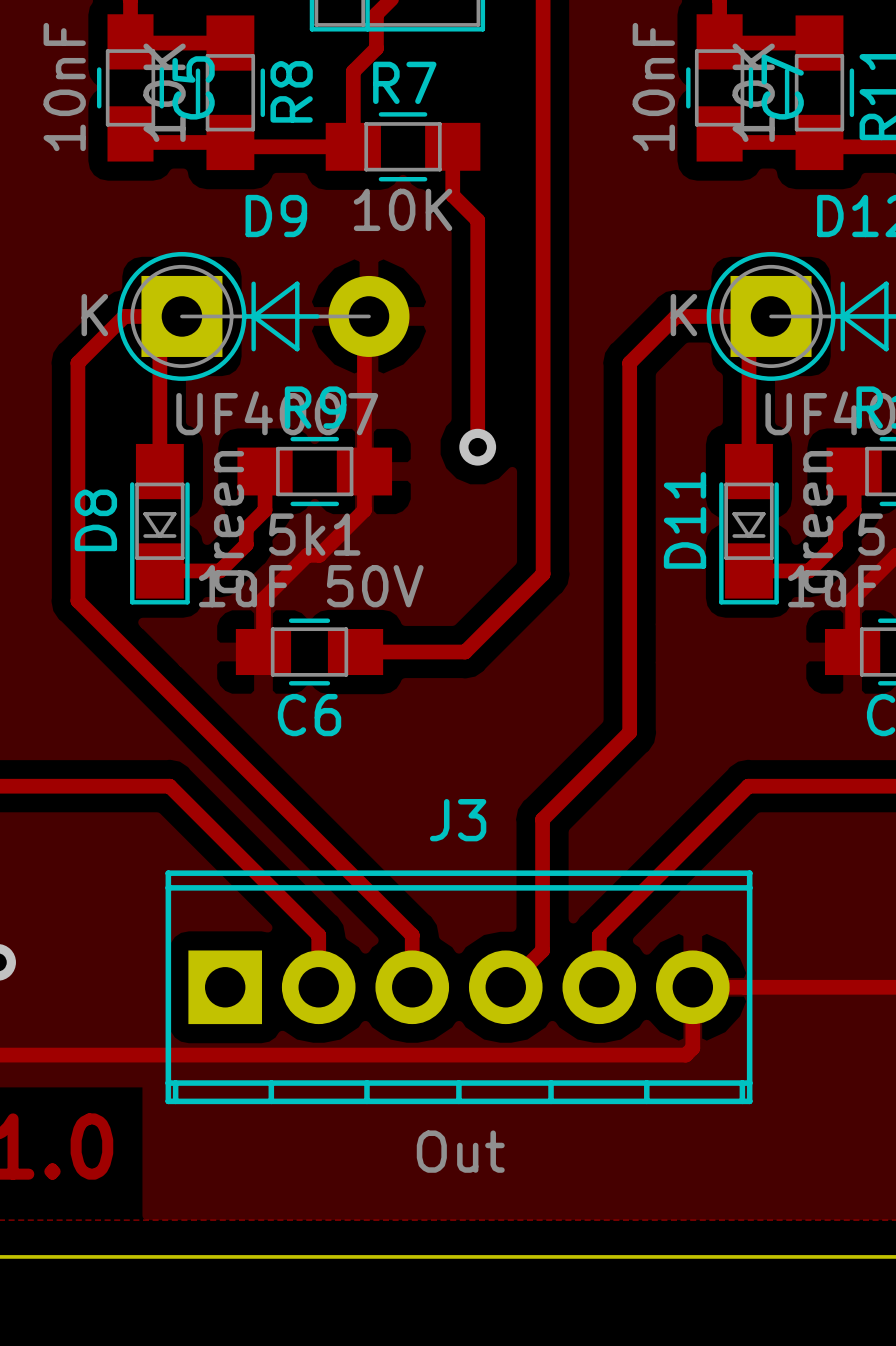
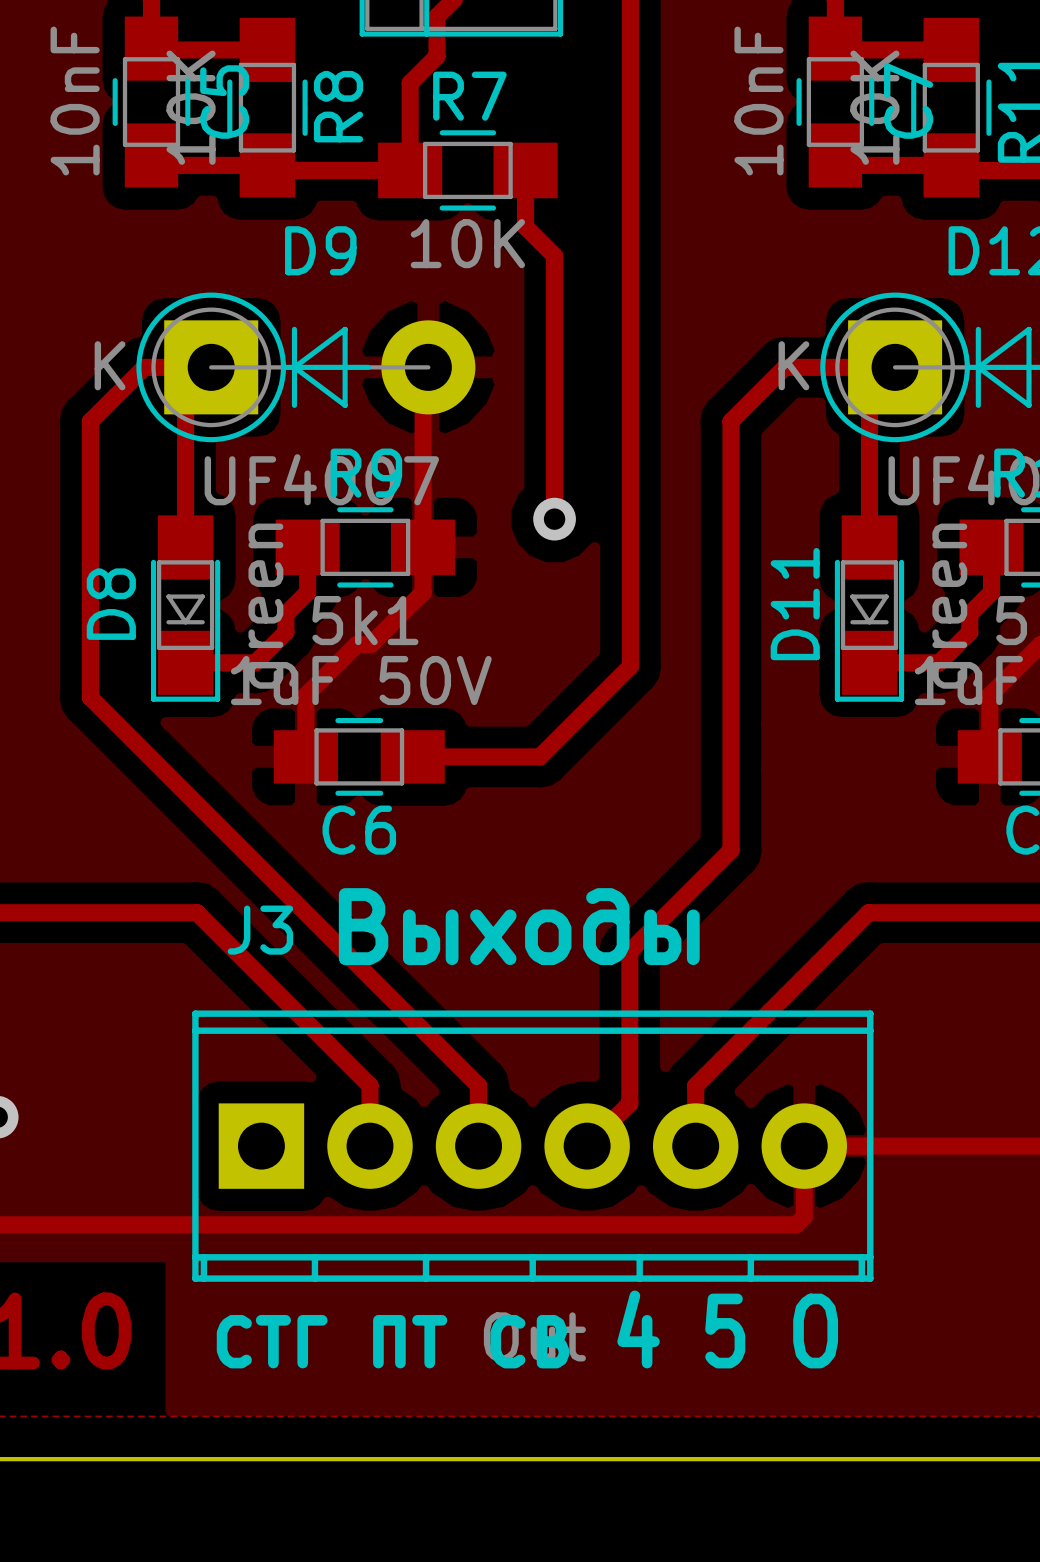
text: none -> Выходы (519, 926)
J3 name position: J3 (458, 820) -> J3 (260, 930)
text: none -> стг пт св 4 5 О (527, 1329)

